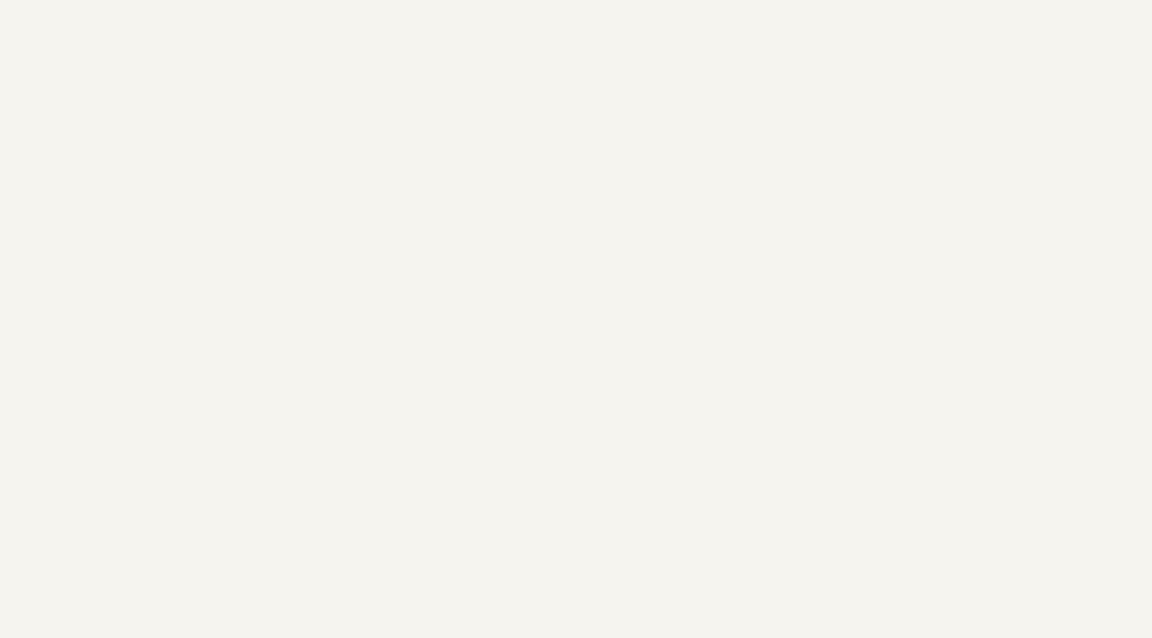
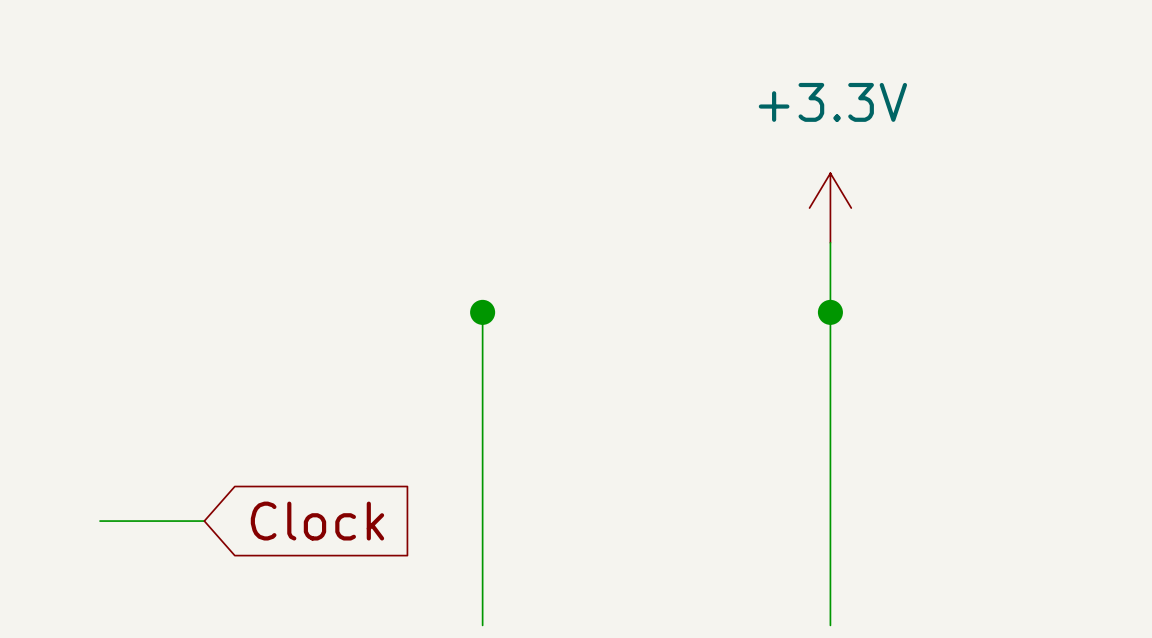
power symbol: none -> +3.3V (830, 208)
wire: none -> (830, 242) (830, 625)
wire: none -> (482, 312) (482, 625)
junction: none -> (482, 312)
junction: none -> (830, 312)
wire: none -> (100, 521) (204, 521)
global label: none -> Clock (317, 521)

